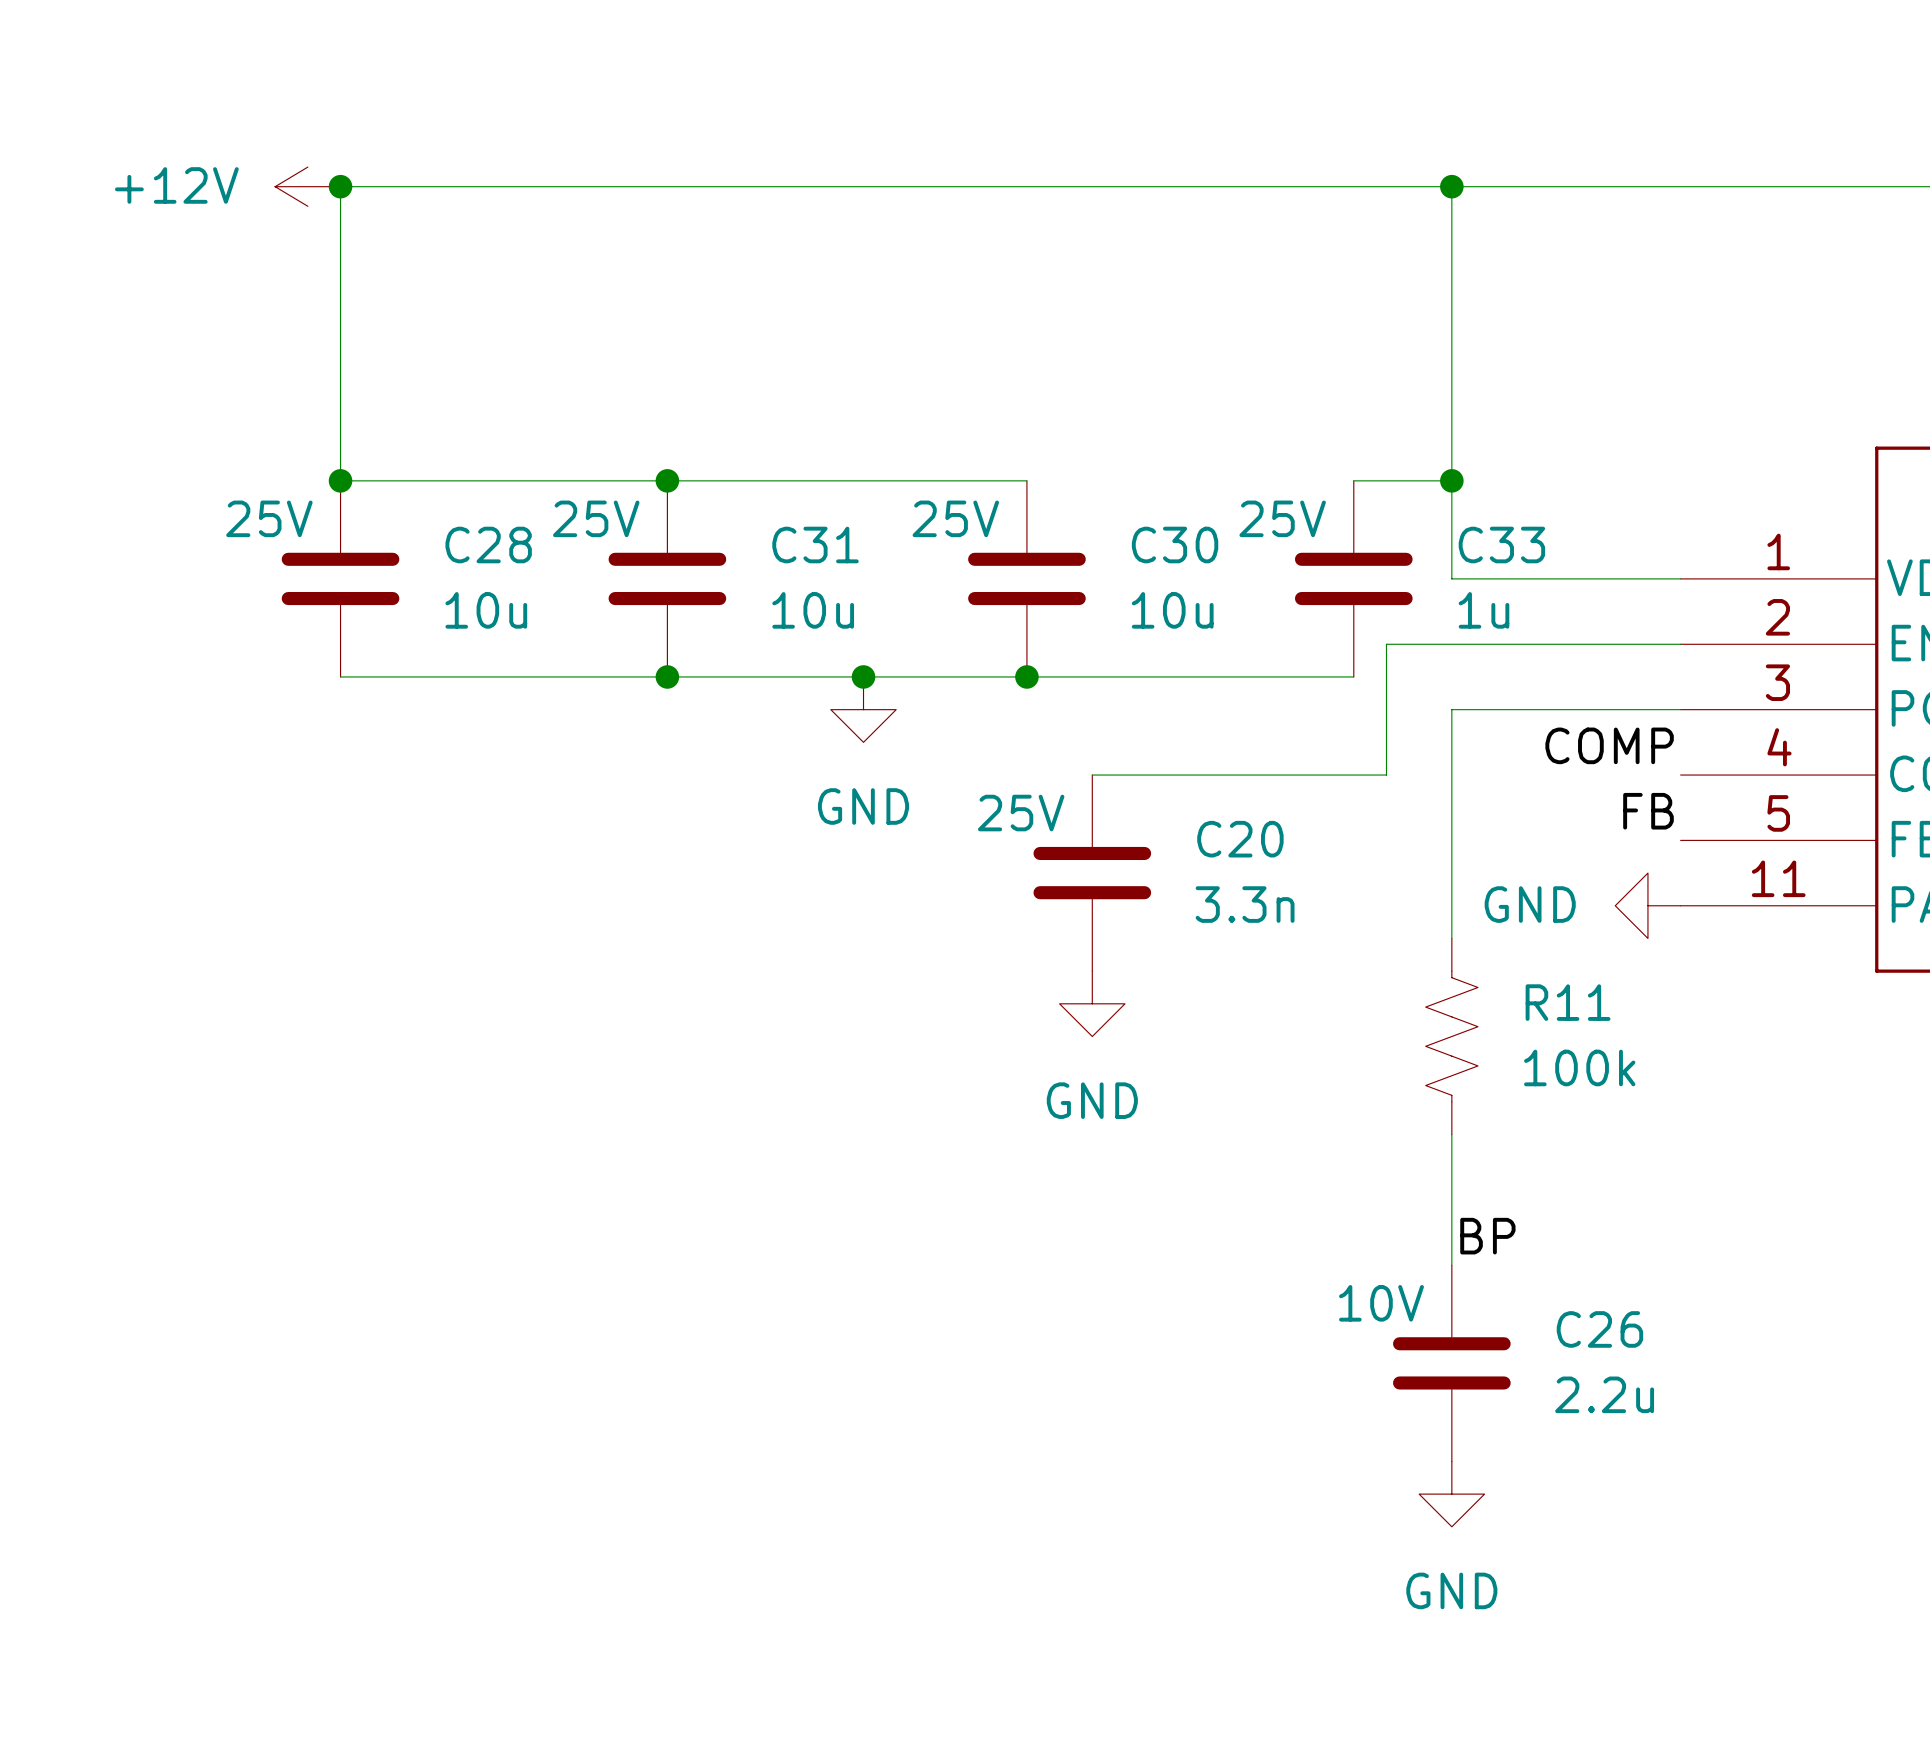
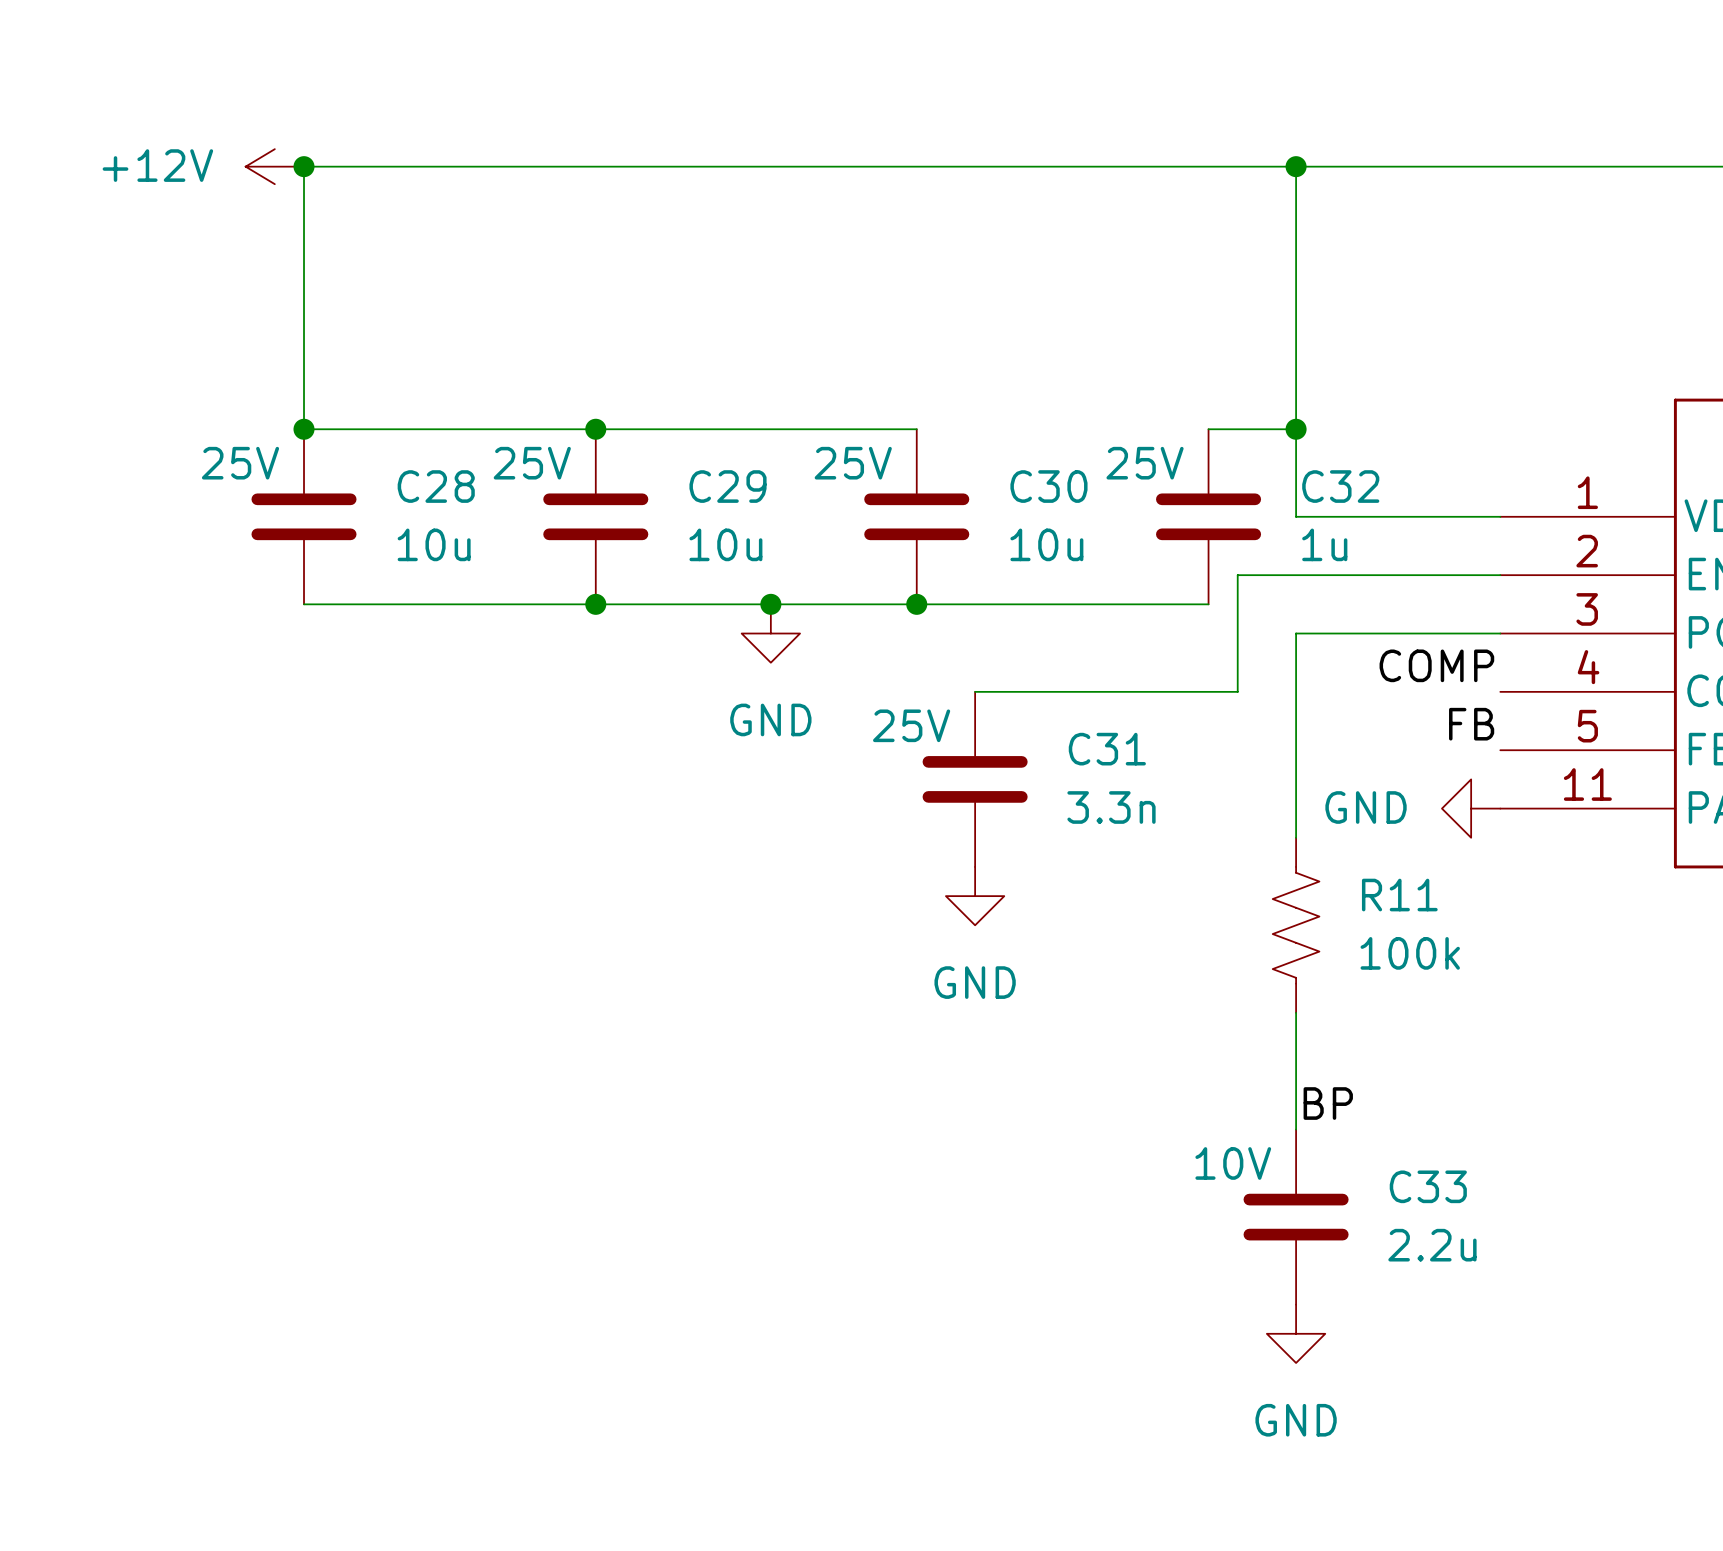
C31 name: C31 (815, 545) -> C29 (728, 486)
C33 name: C33 (1501, 545) -> C32 (1340, 486)
C20 name: C20 (1240, 839) -> C31 (1107, 749)
C26 name: C26 (1599, 1329) -> C33 (1428, 1186)

